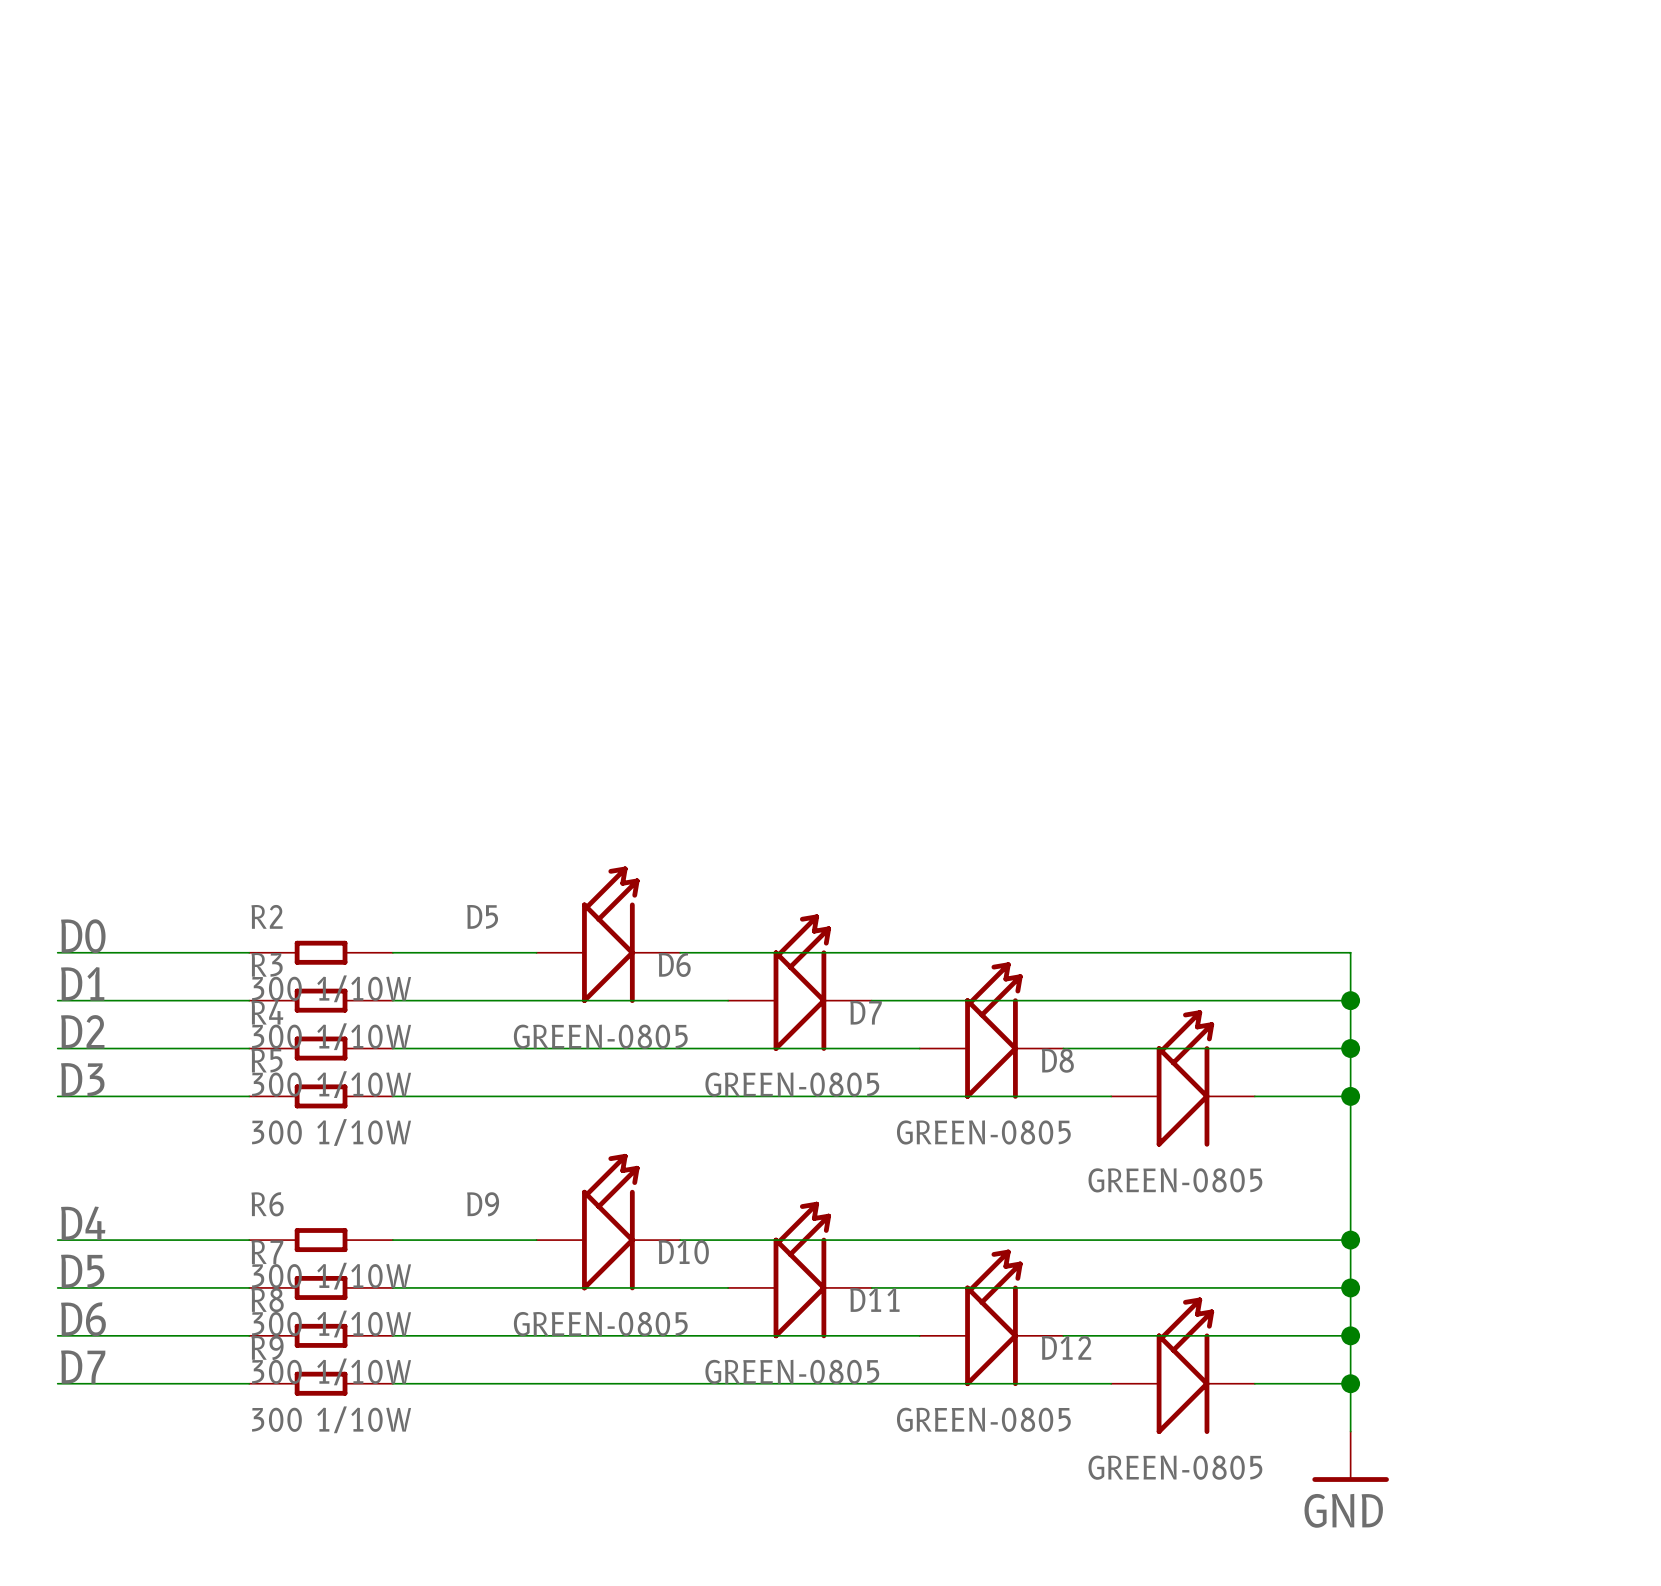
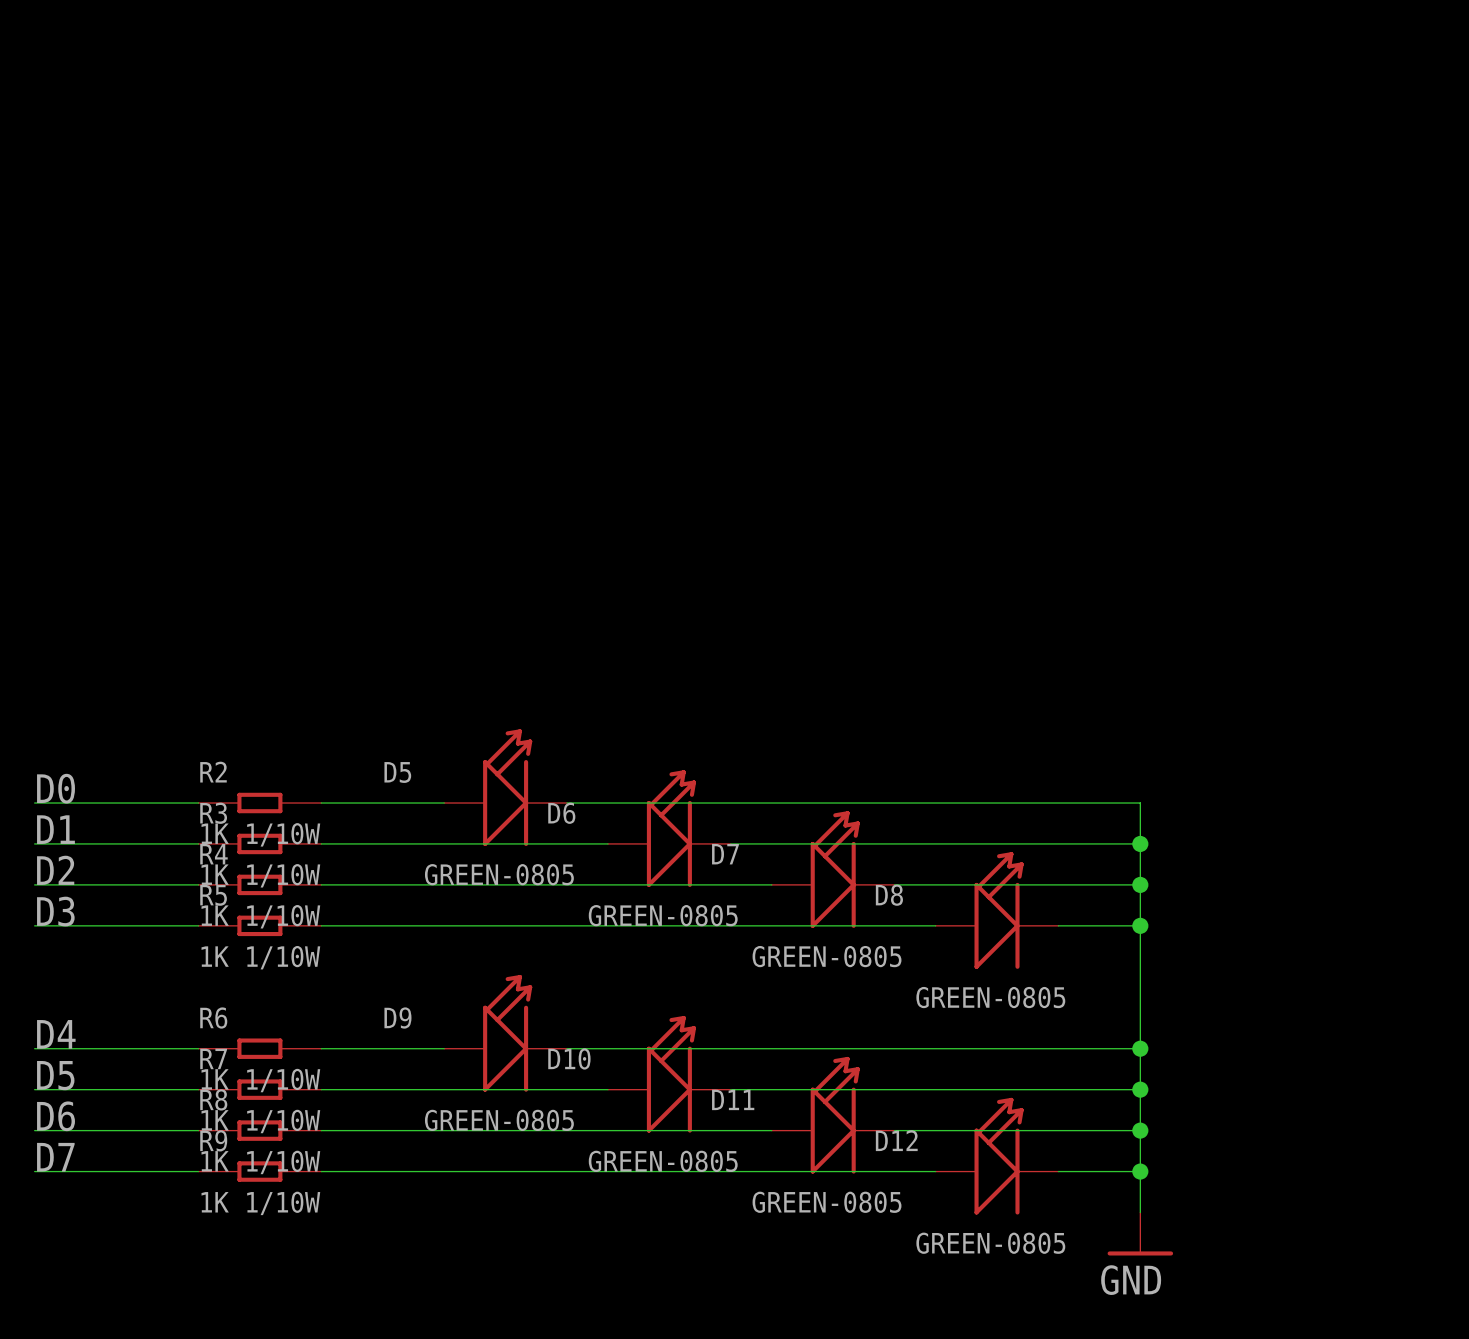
R2 value: 300 1/10W (331, 988) -> 1K 1/10W (260, 834)
R3 value: 300 1/10W (331, 1036) -> 1K 1/10W (260, 875)
R4 value: 300 1/10W (331, 1084) -> 1K 1/10W (260, 916)
R5 value: 300 1/10W (331, 1132) -> 1K 1/10W (260, 957)
R6 value: 300 1/10W (331, 1276) -> 1K 1/10W (260, 1080)
R7 value: 300 1/10W (331, 1324) -> 1K 1/10W (260, 1121)
R8 value: 300 1/10W (331, 1371) -> 1K 1/10W (260, 1162)
R9 value: 300 1/10W (331, 1419) -> 1K 1/10W (260, 1203)

